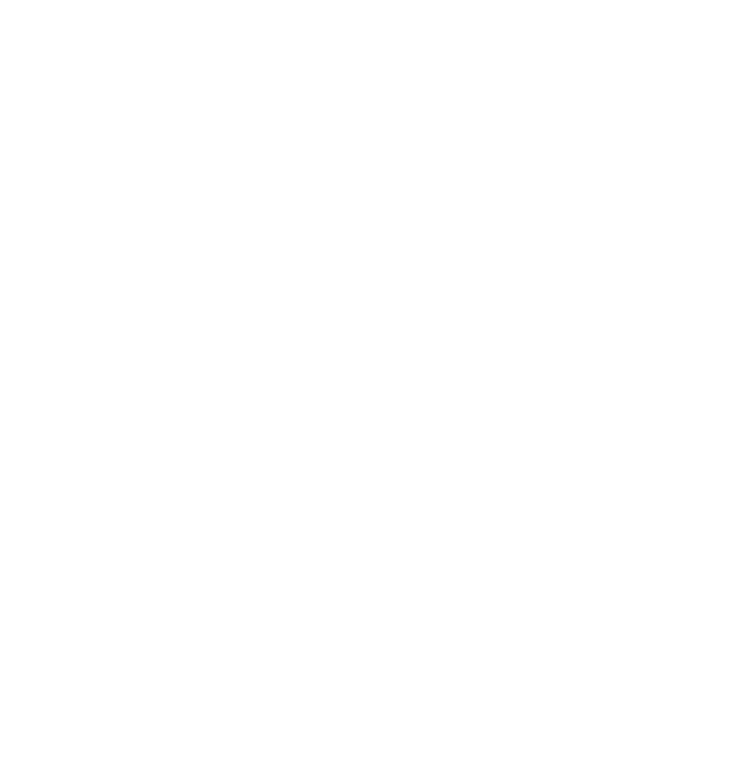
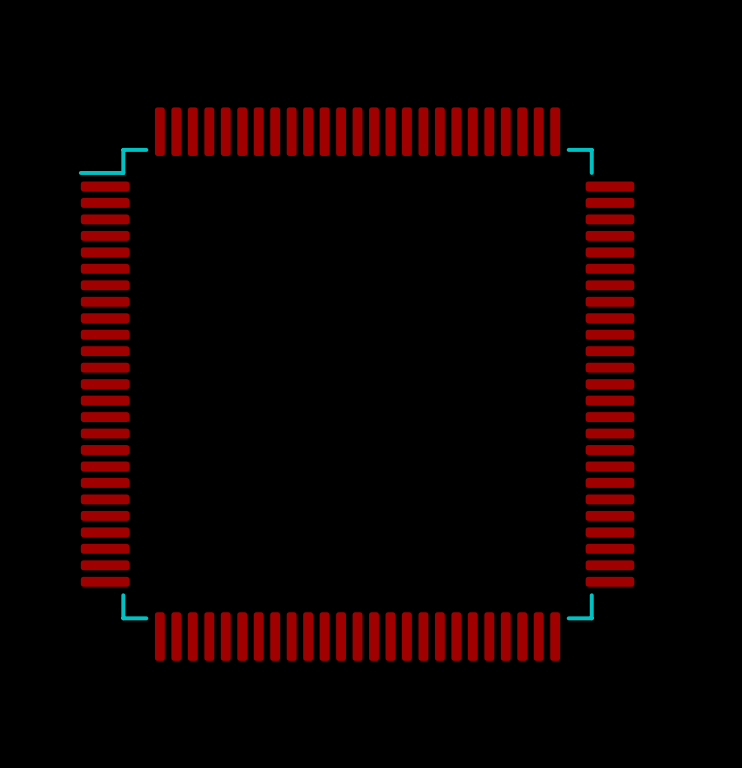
part: none -> (356, 384)

